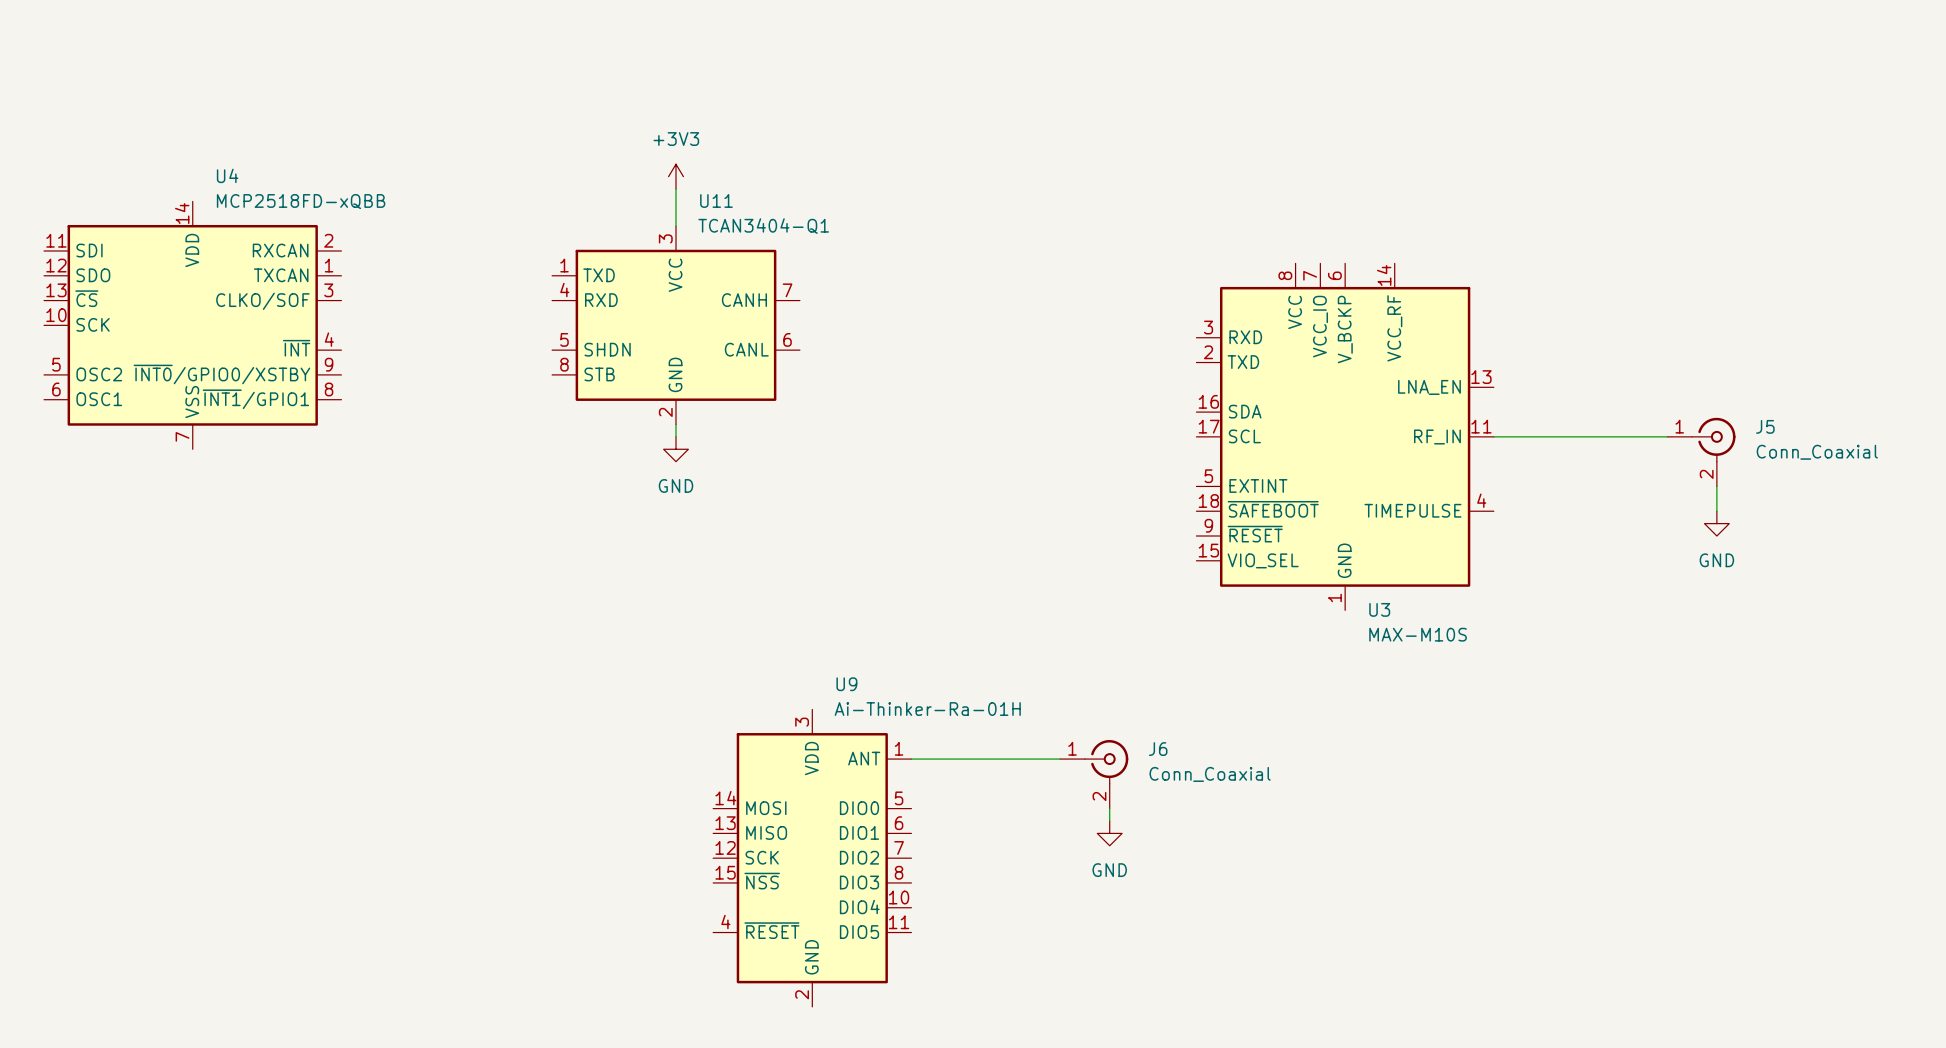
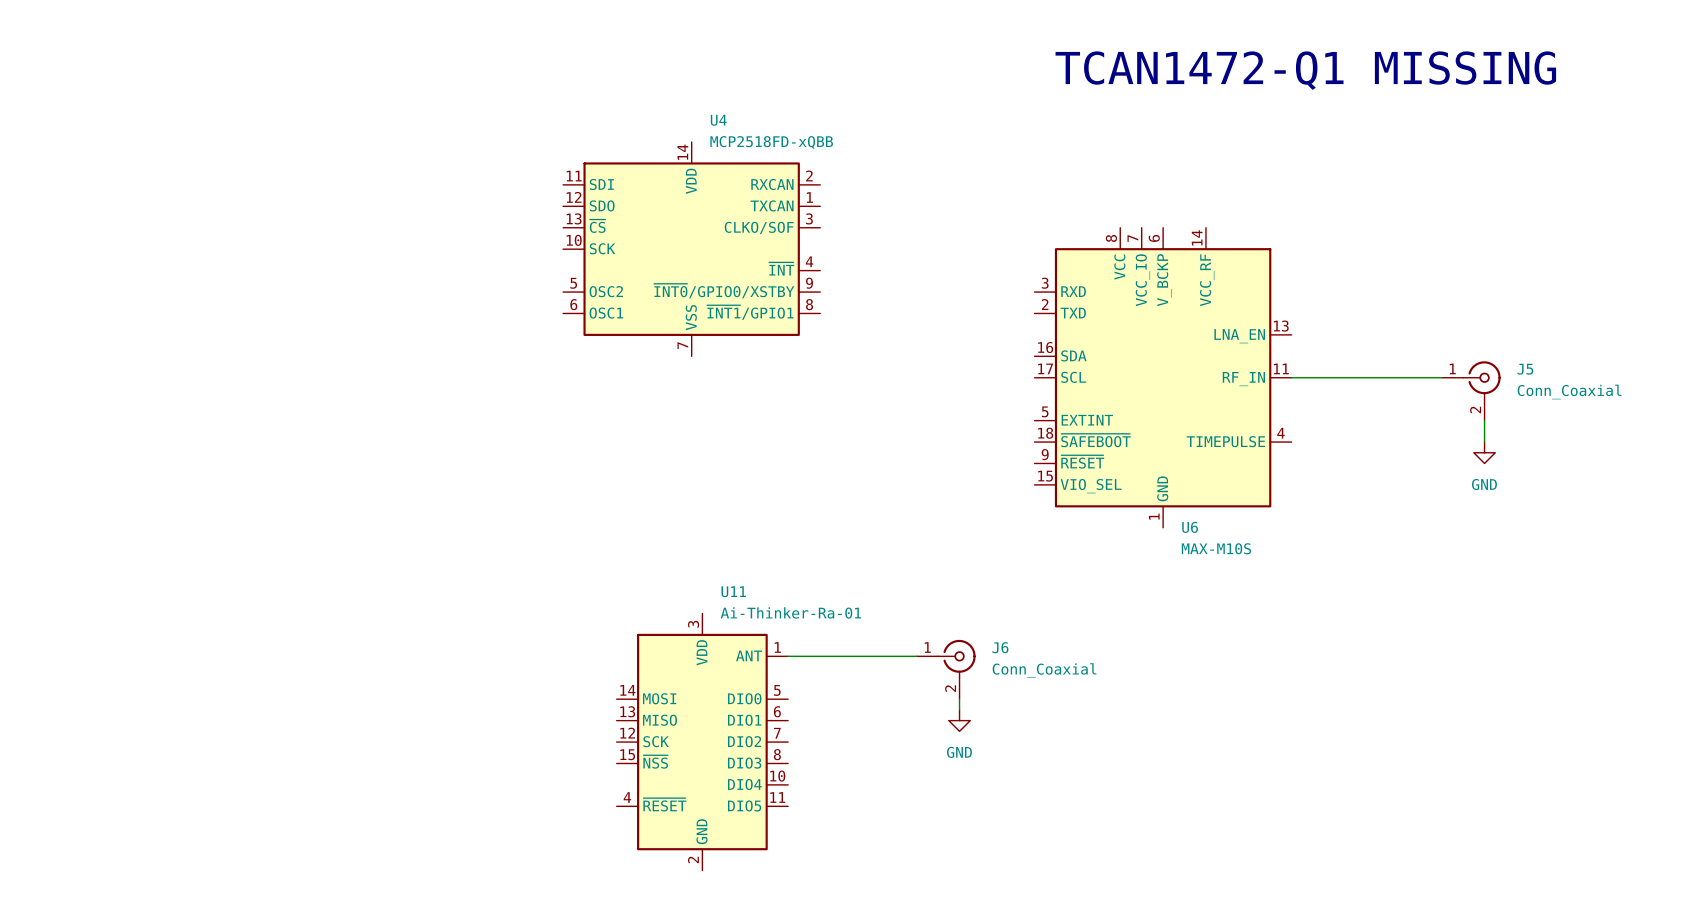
text: none -> TCAN1472-Q1 MISSING (1305, 70)
power symbol: +3V3 (676, 176) -> none
U4 position: (192, 325) -> (691, 249)
U11: TCAN3404-Q1 (676, 325) -> none
wire: (676, 424) (676, 436) -> none
power symbol: GND (676, 449) -> none
U3 name: U3 (1379, 609) -> U6 (1190, 527)
U9 name: U9 (846, 684) -> U11 (733, 591)
U9 value: Ai-Thinker-Ra-01H (927, 709) -> Ai-Thinker-Ra-01 (790, 612)

